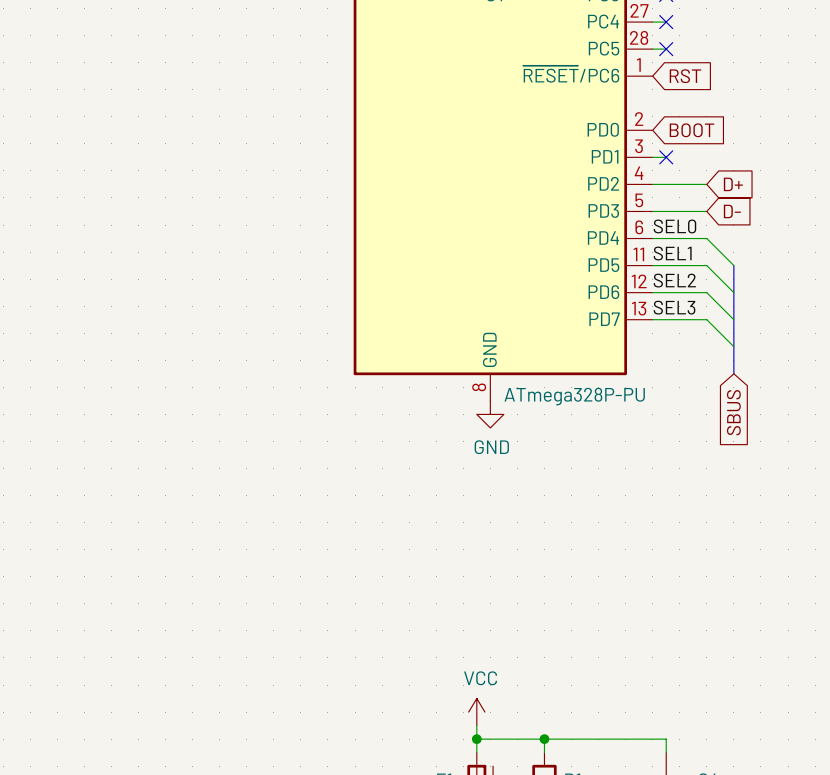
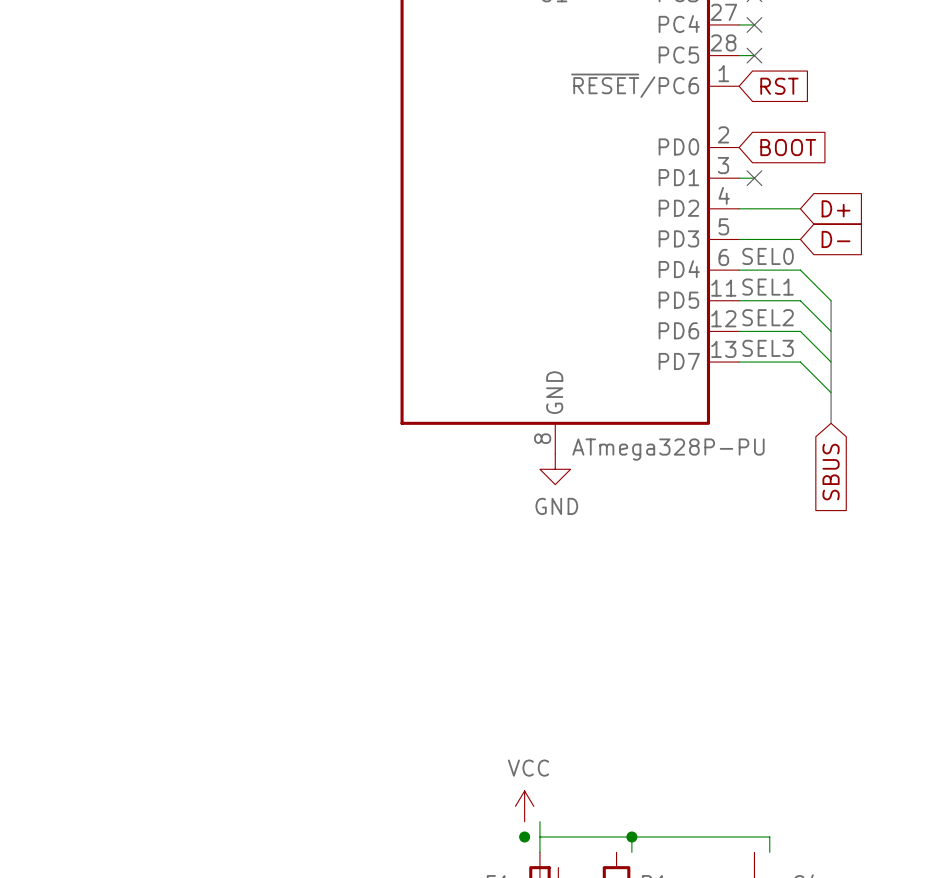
power symbol position: VCC (476, 712) -> VCC (524, 806)
junction position: (476, 739) -> (524, 837)
wire: (544, 739) (544, 752) -> (631, 837) (631, 852)
junction position: (544, 739) -> (631, 837)
wire: (666, 739) (666, 752) -> (754, 837) (769, 837) (769, 852)

